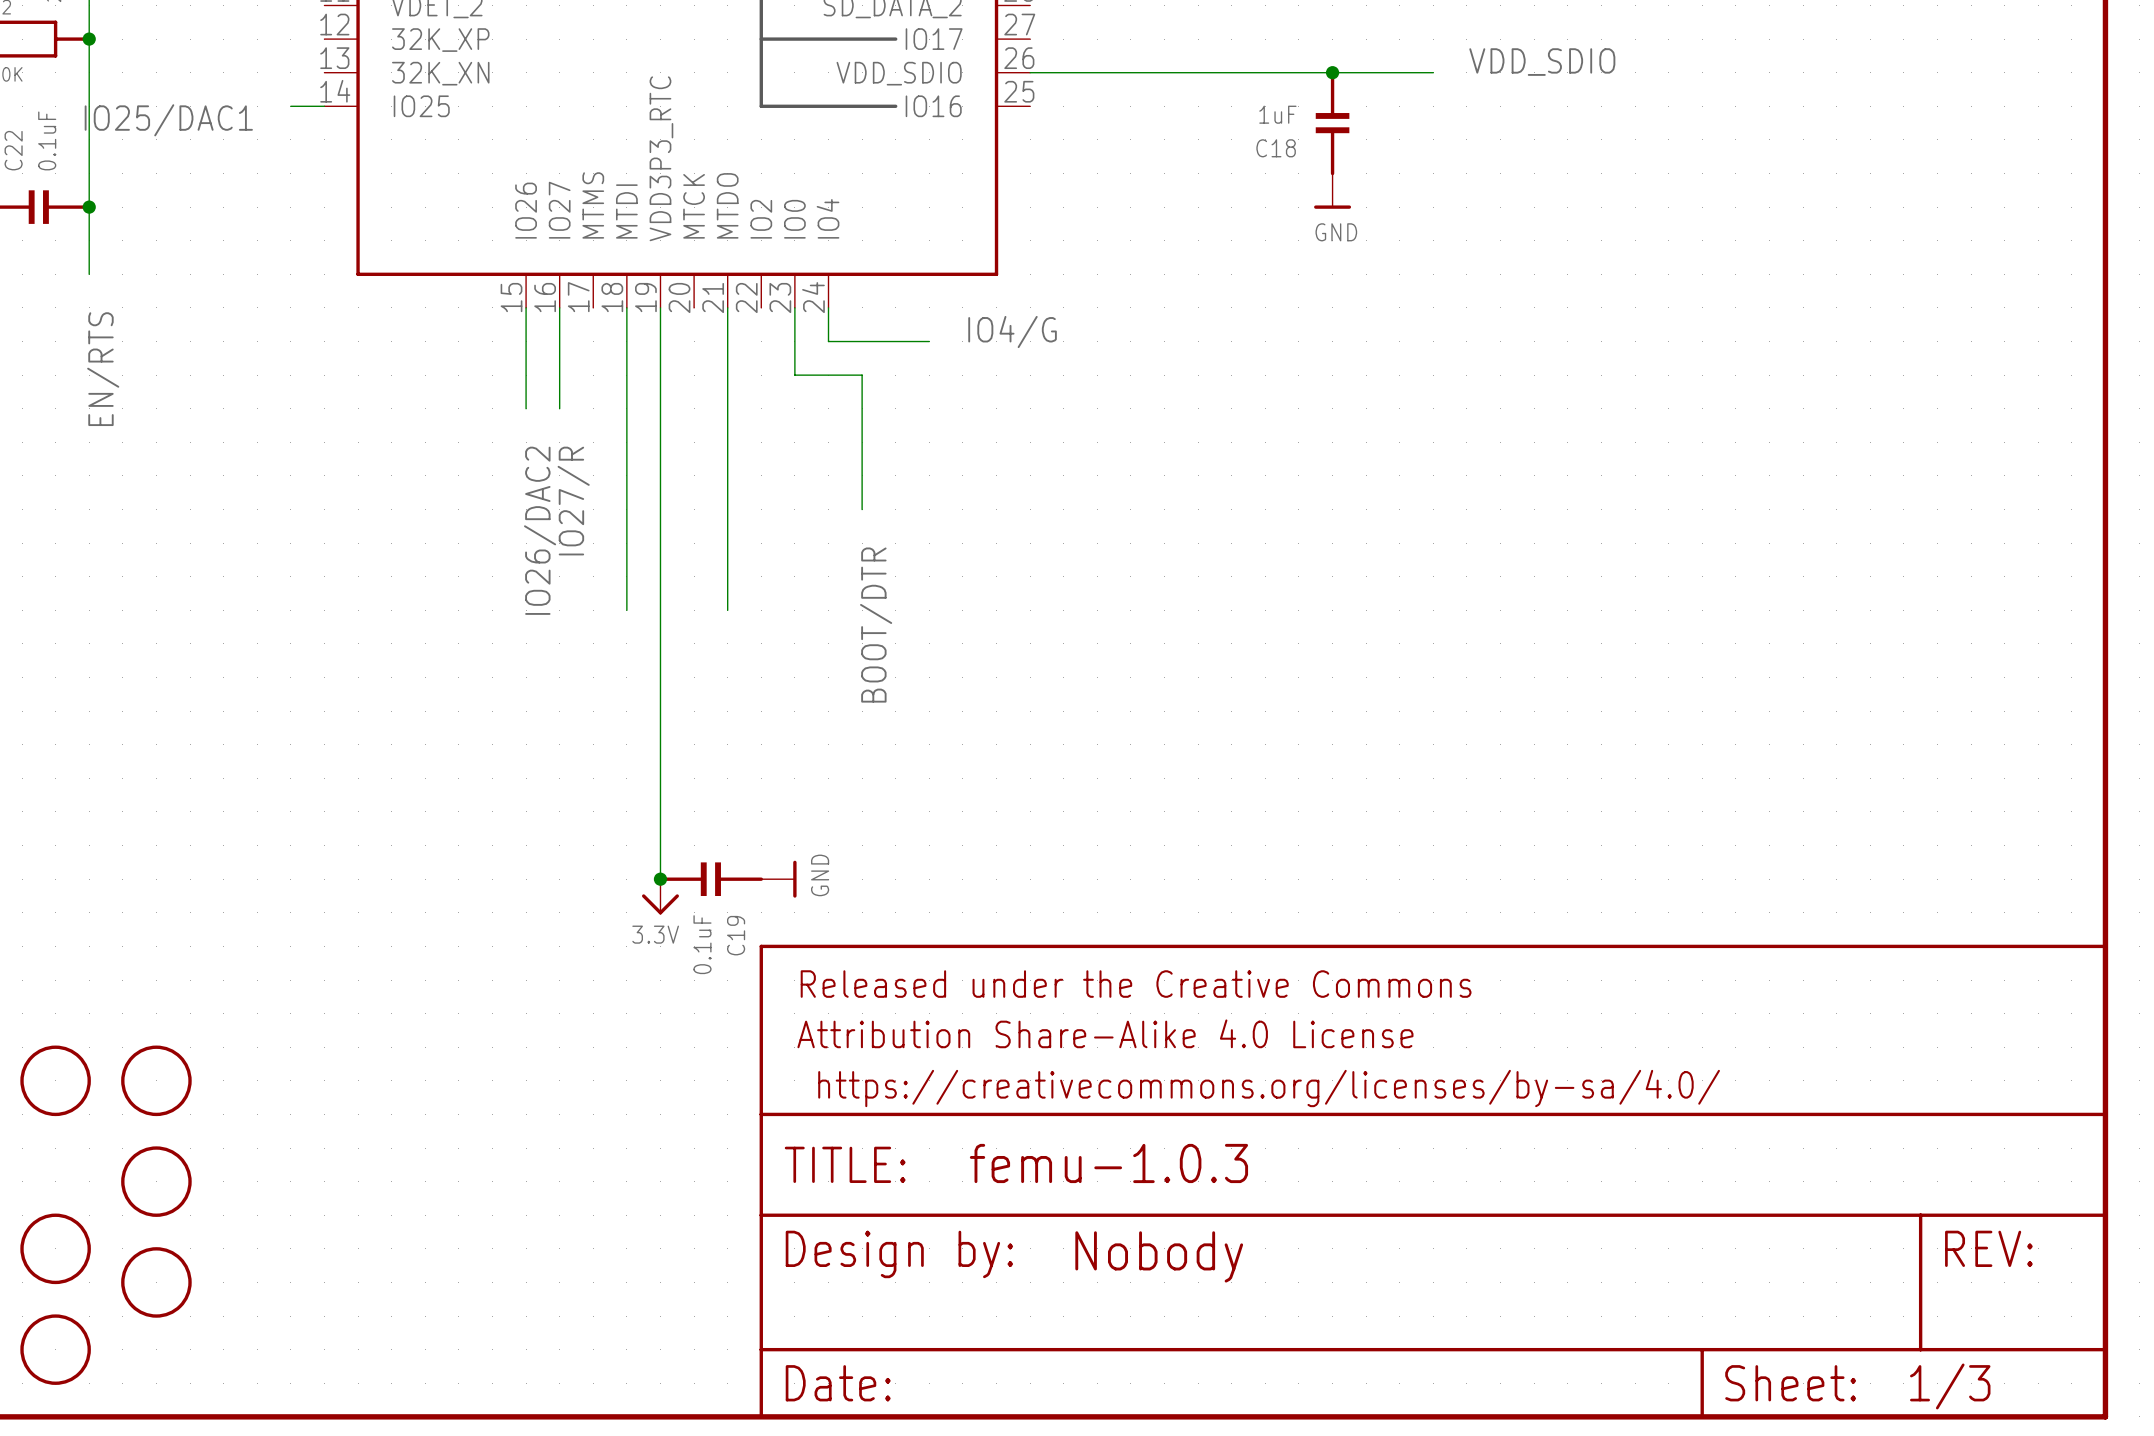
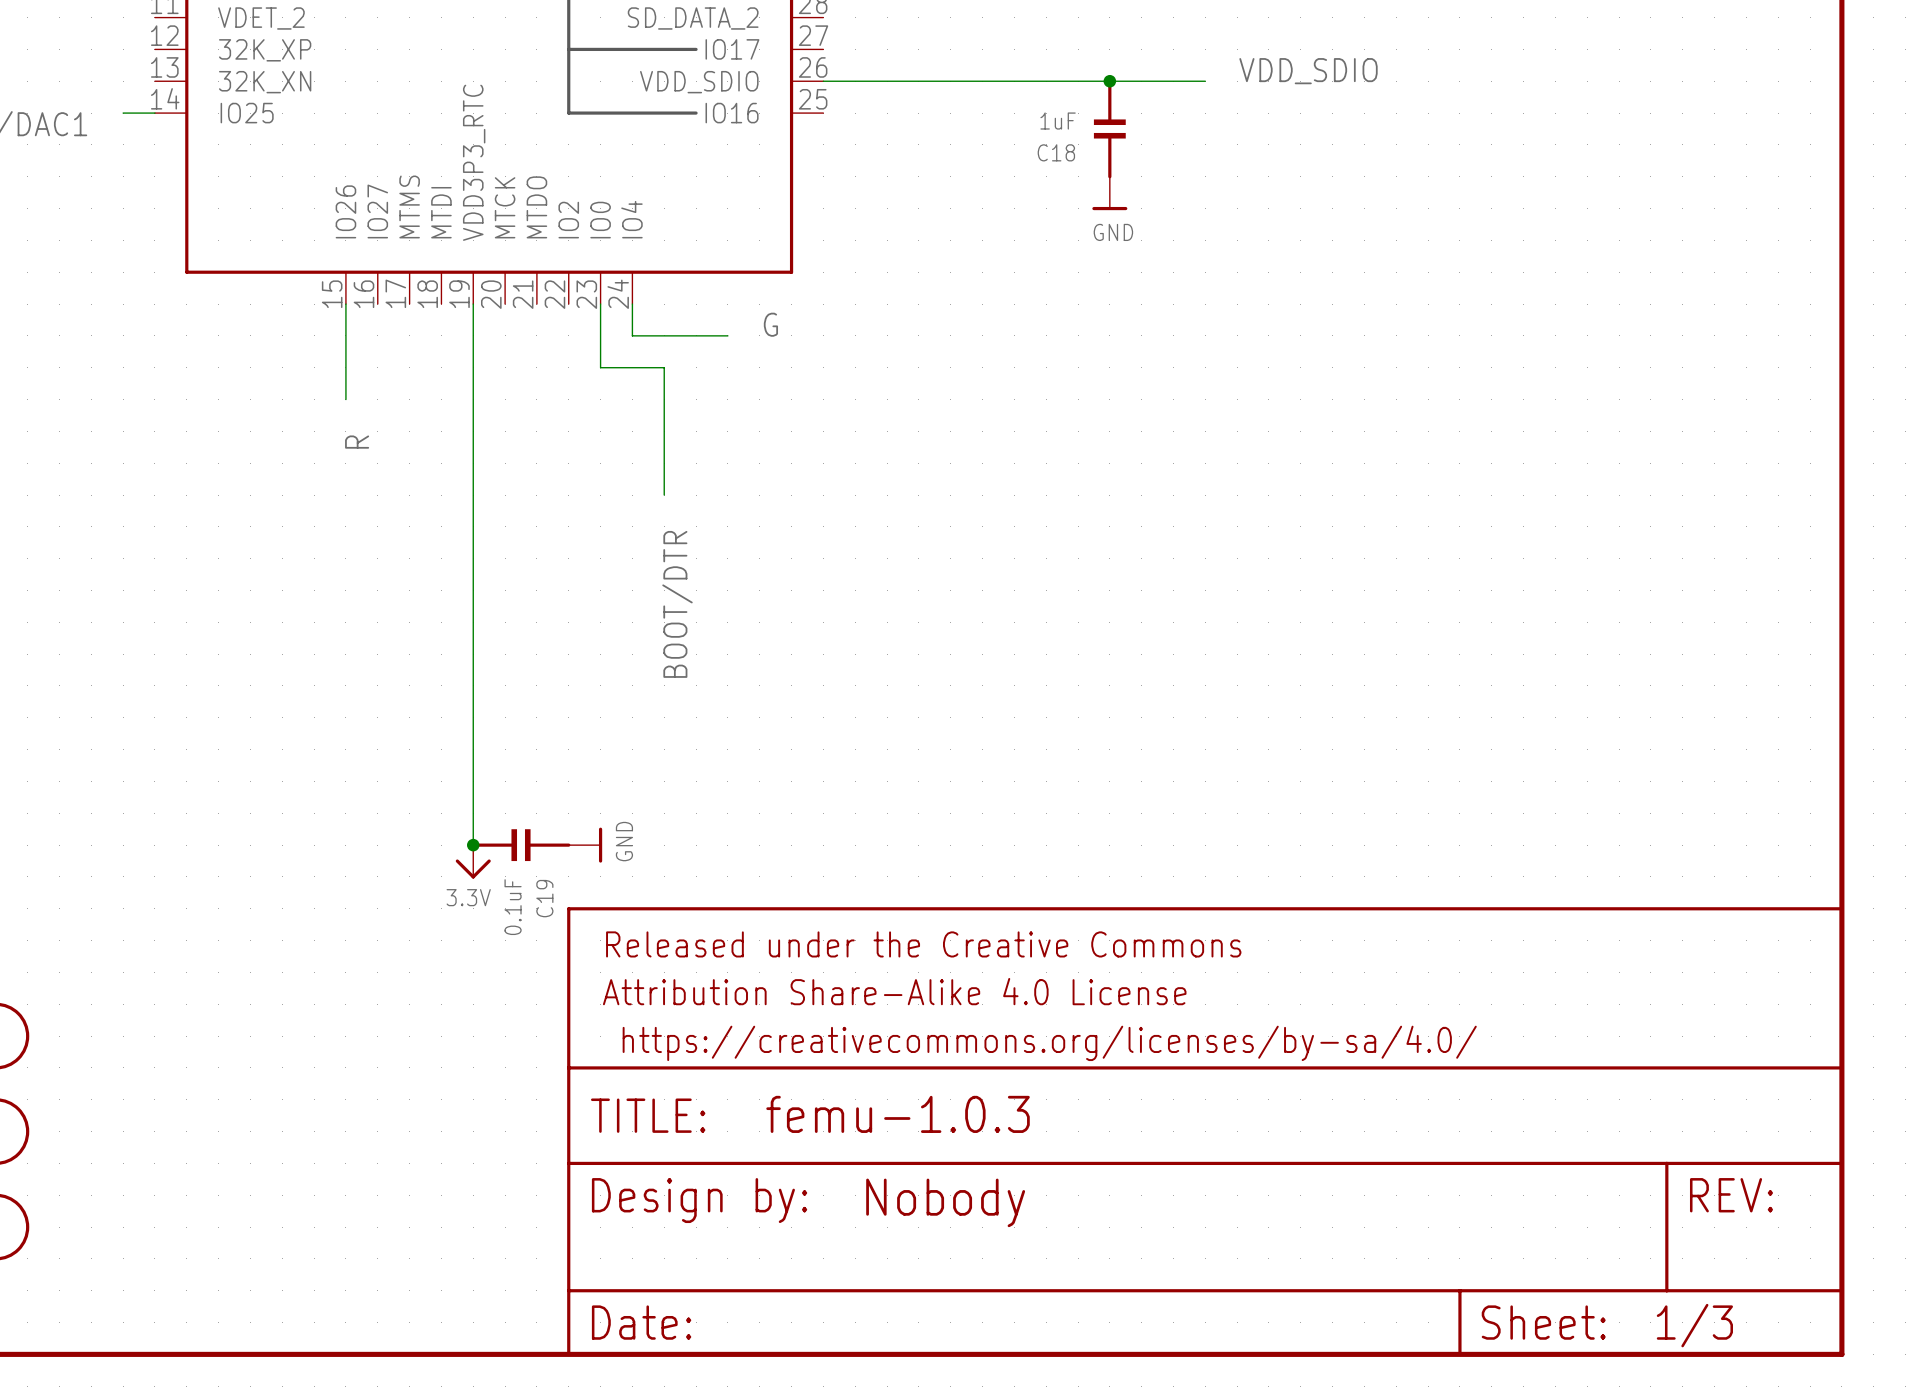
wire: (559, 307) (559, 408) -> none
wire: (626, 307) (626, 610) -> none
wire: (727, 307) (727, 610) -> none
label: IO4/G (1012, 332) -> G (770, 324)
label: IO27/R (573, 501) -> none
label: IO26/DAC2 (540, 530) -> R (357, 442)

